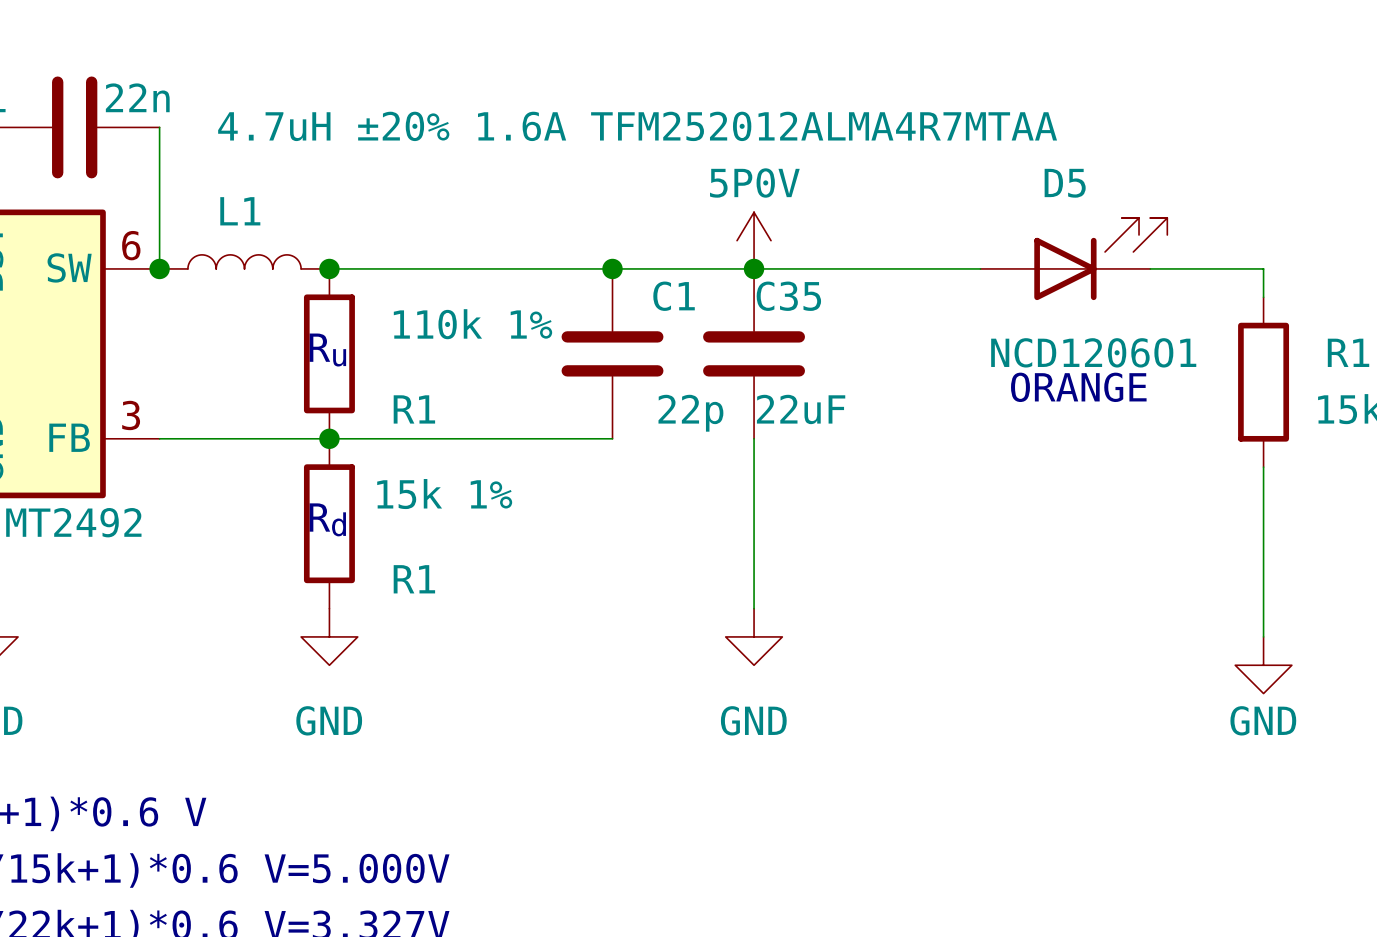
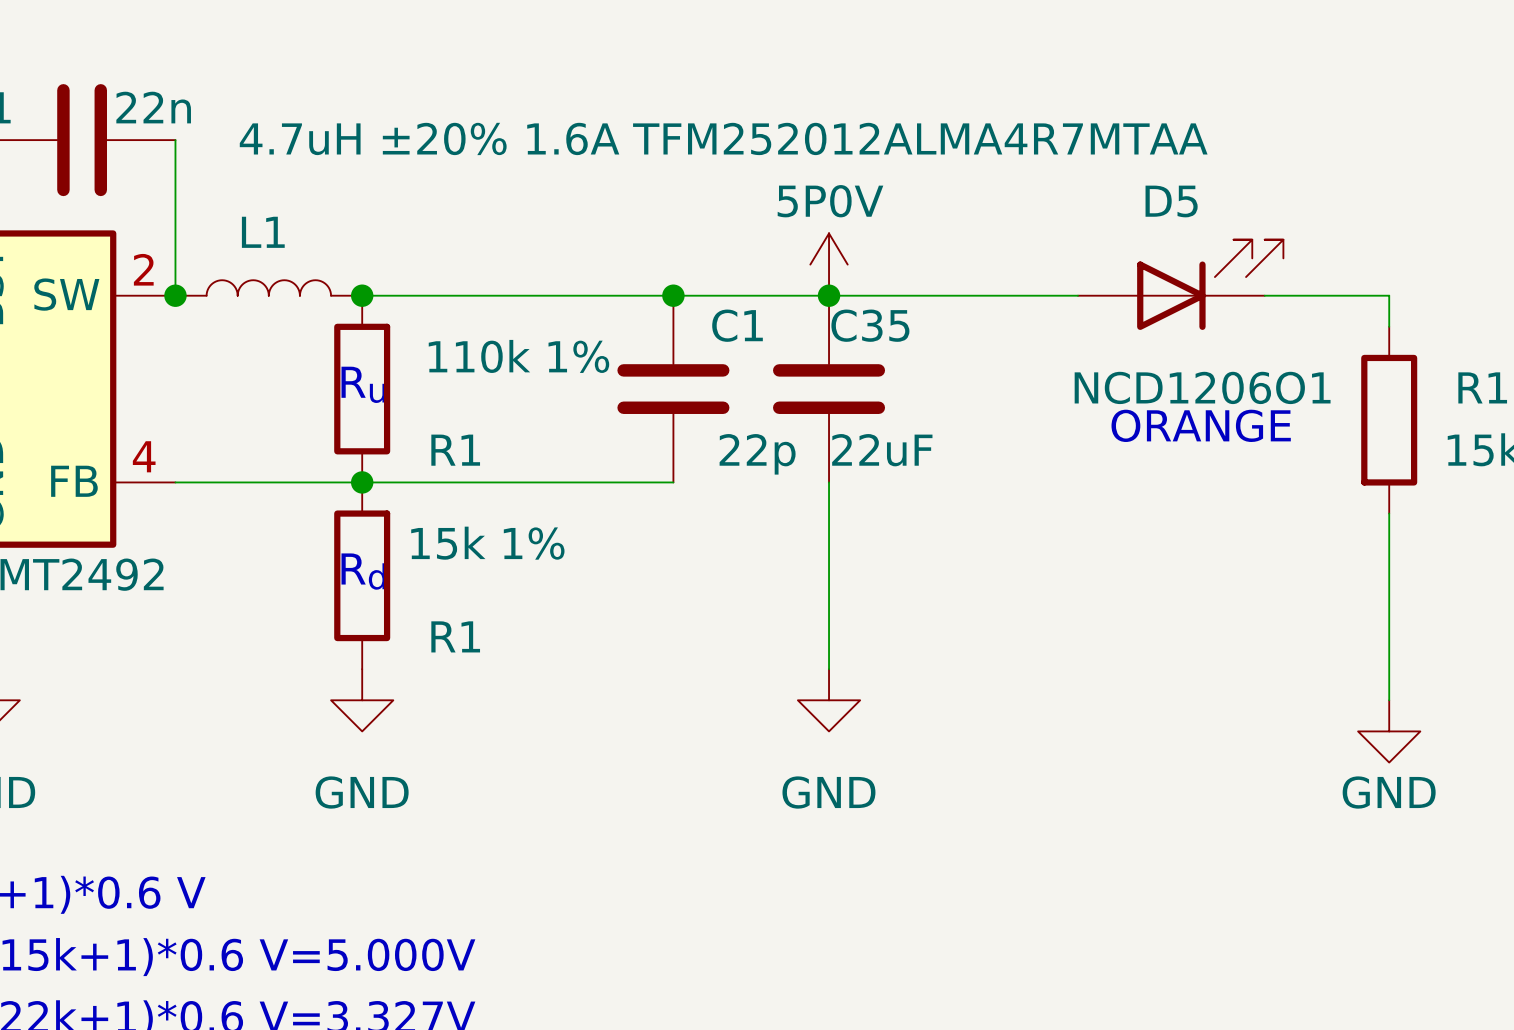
part pin number: 6 (131, 245) -> 2 (143, 269)
part pin number: 3 (131, 415) -> 4 (144, 456)

